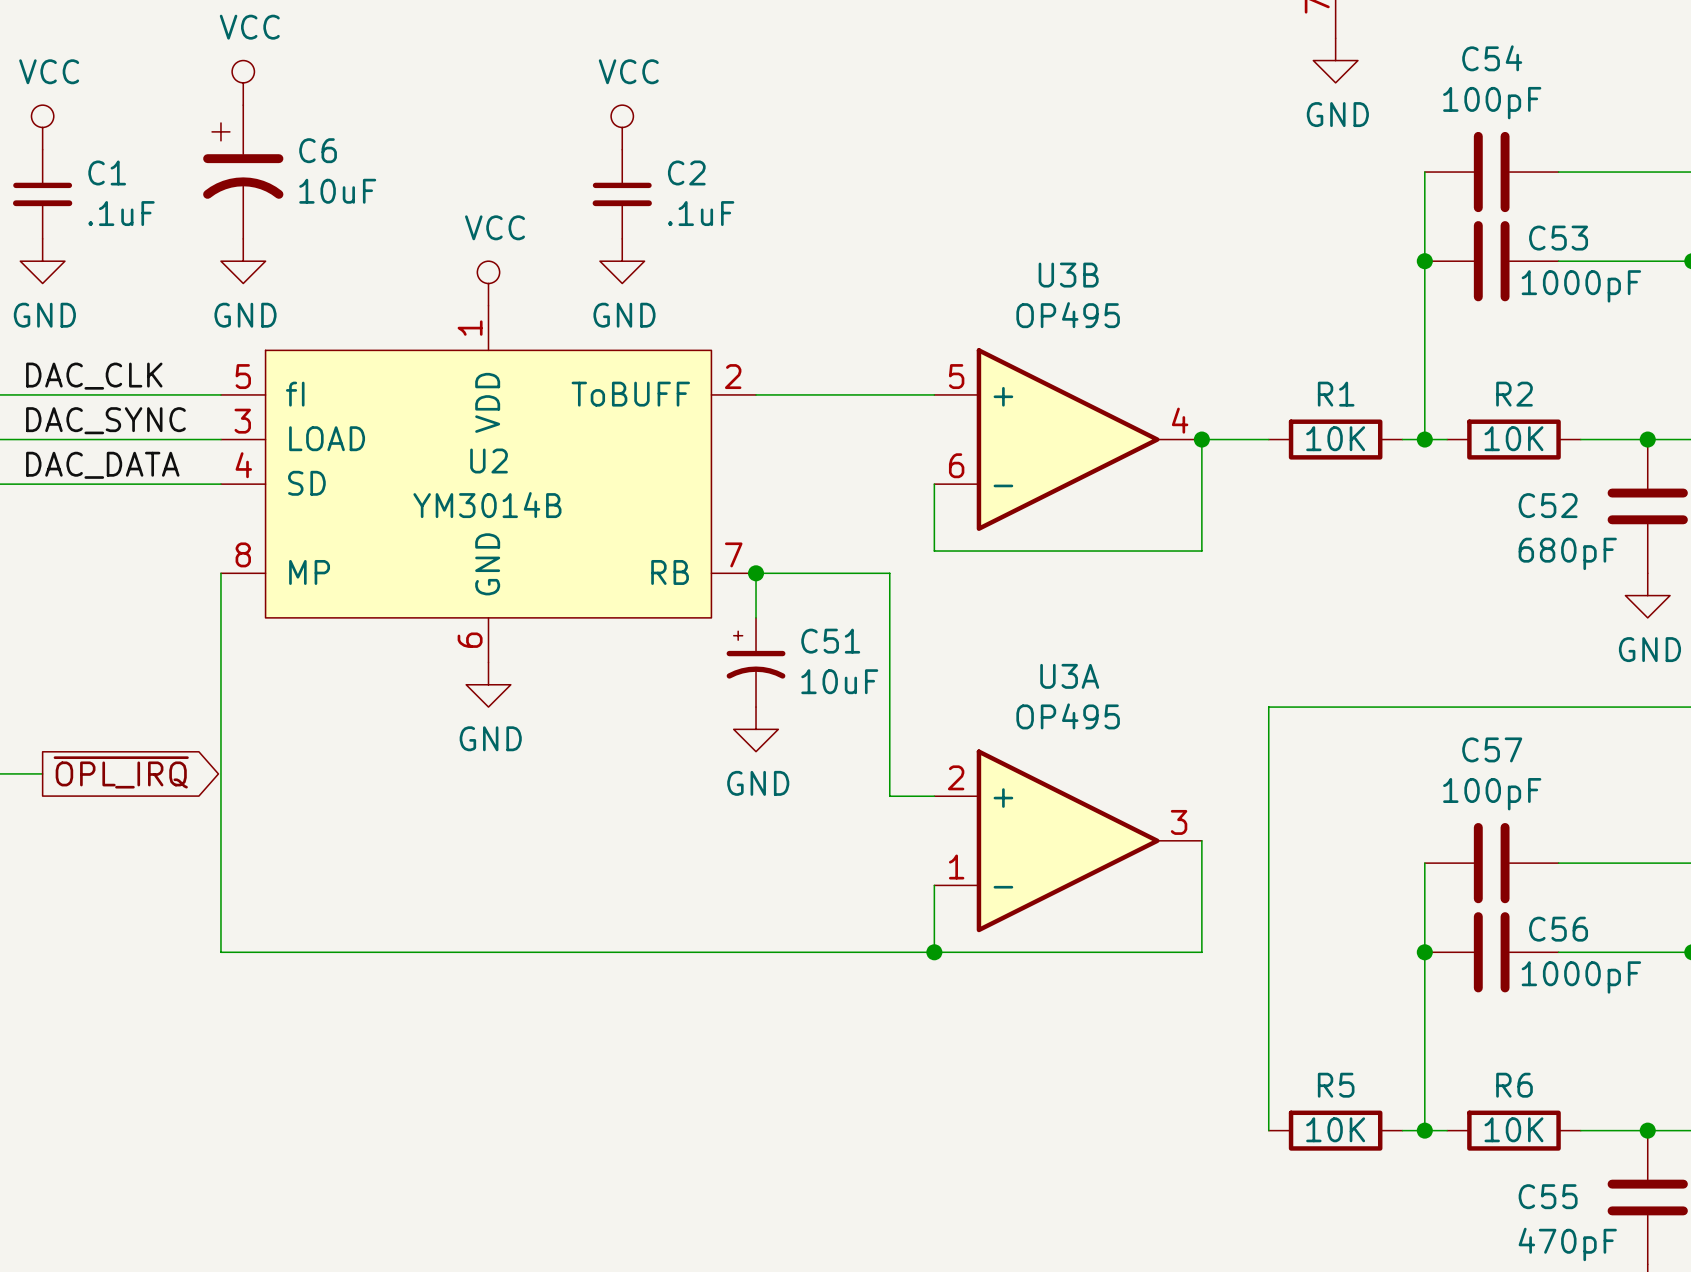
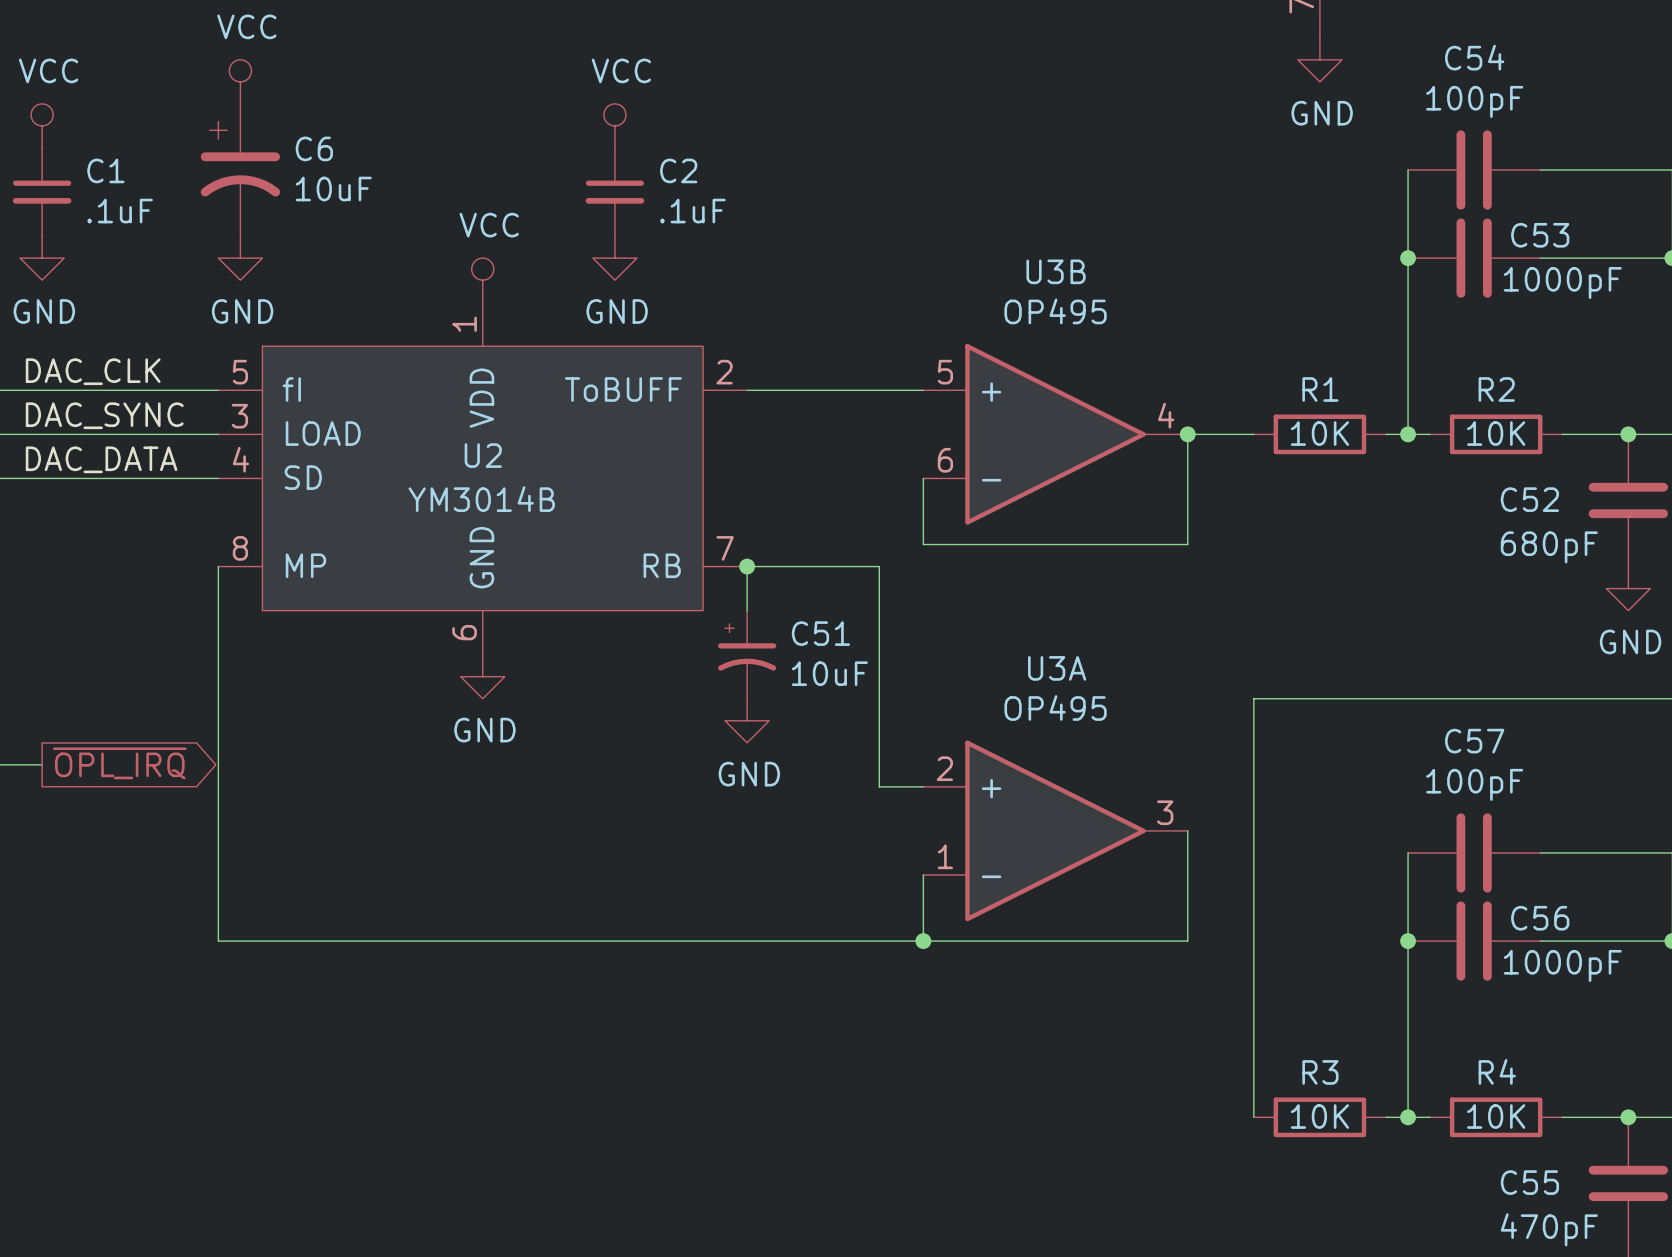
R5 name: R5 (1336, 1085) -> R3 (1320, 1072)
R6 name: R6 (1514, 1085) -> R4 (1497, 1071)

